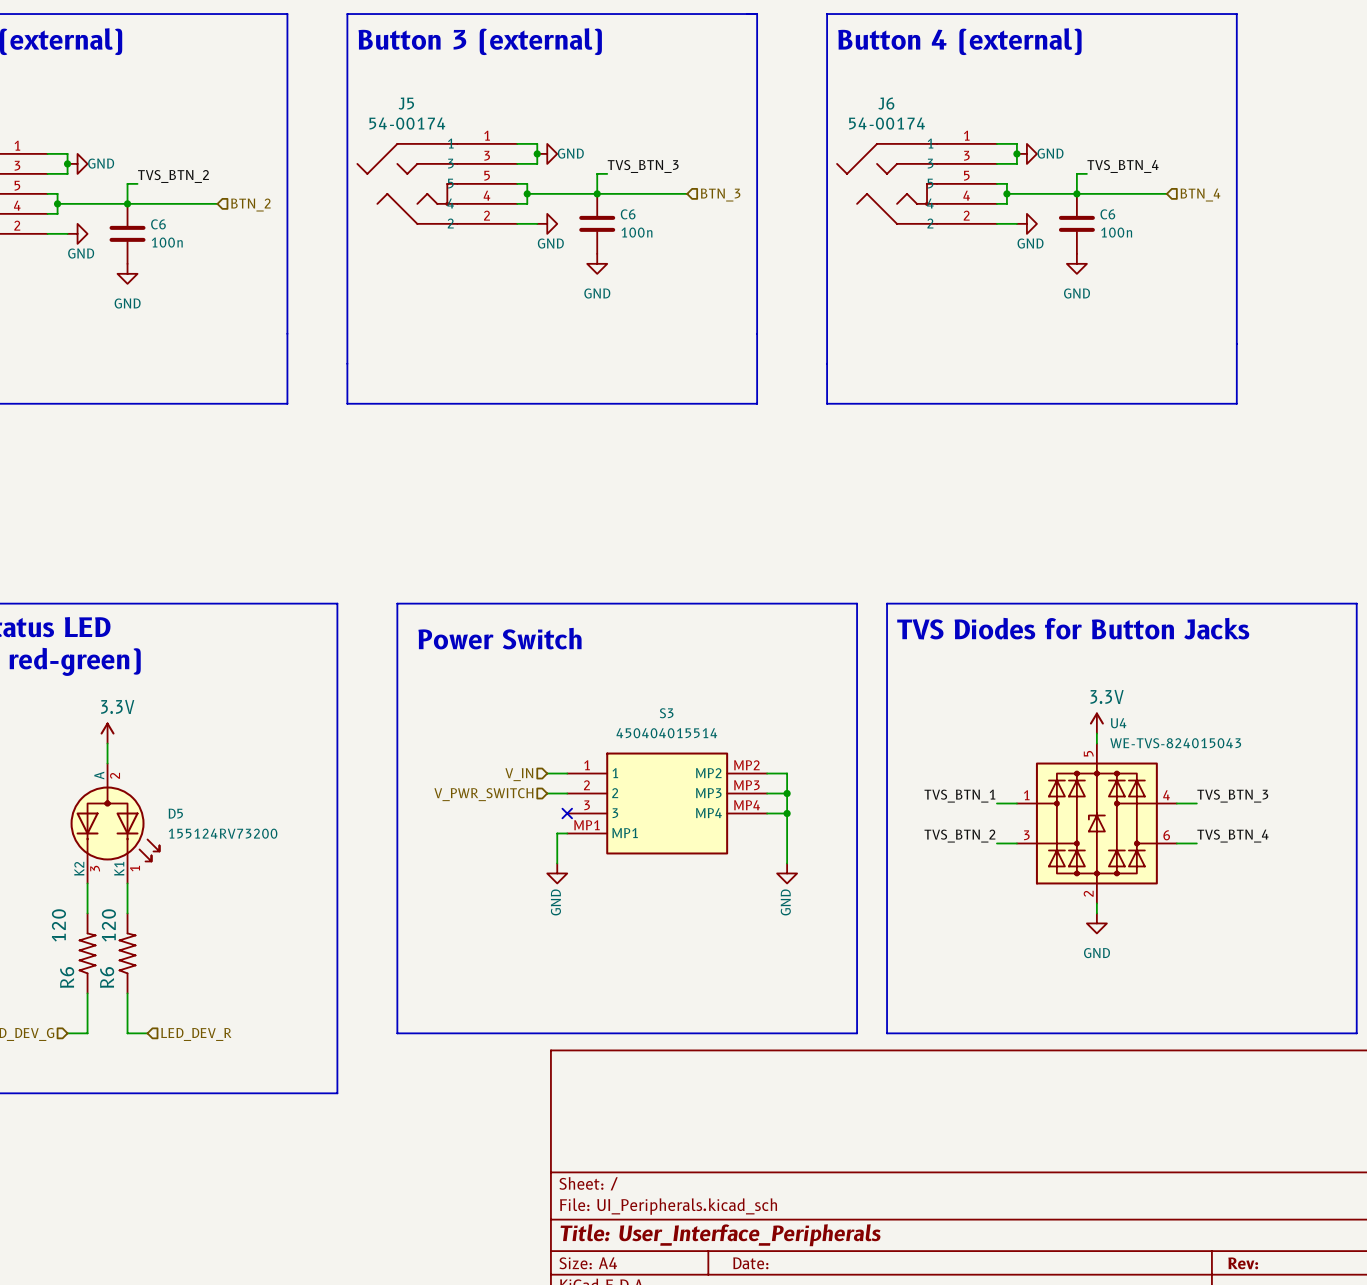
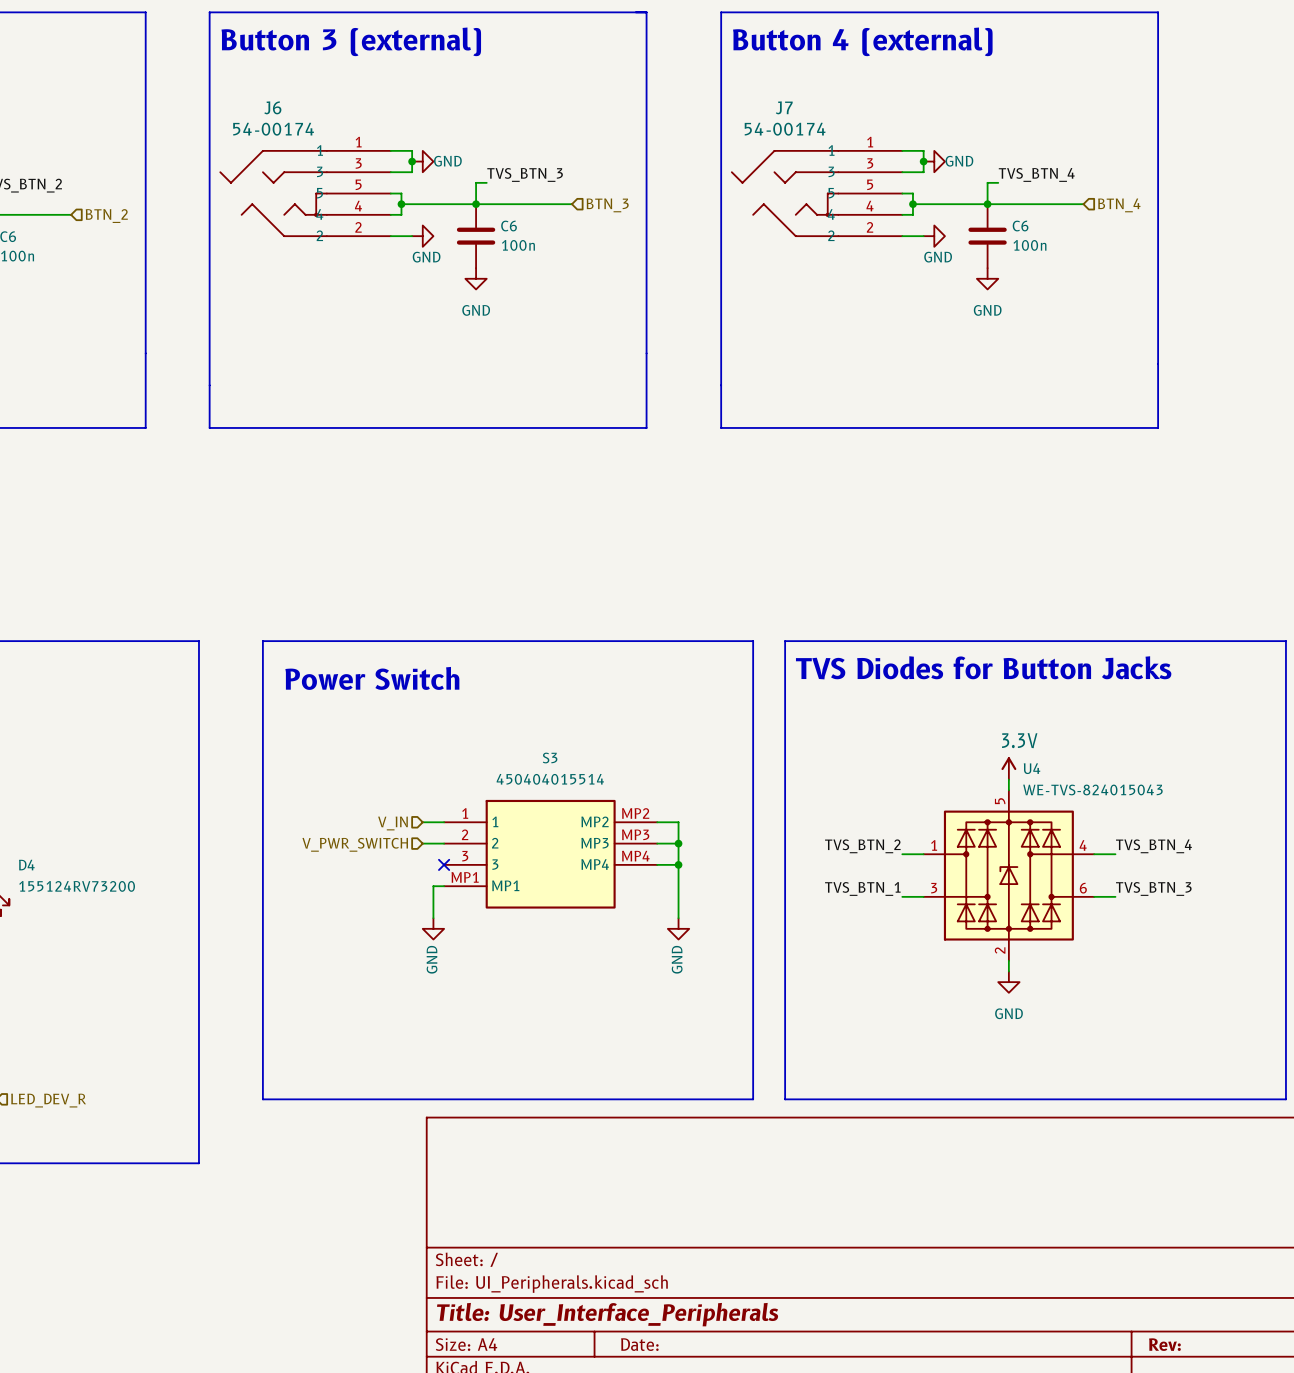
J5 name: J5 (406, 103) -> J6 (272, 107)
J6 name: J6 (886, 103) -> J7 (784, 107)
label: TVS_BTN_1 (959, 796) -> TVS_BTN_2 (862, 846)
label: TVS_BTN_3 (1232, 796) -> TVS_BTN_4 (1153, 846)
D5 name: D5 (175, 813) -> D4 (26, 865)
label: TVS_BTN_2 (959, 836) -> TVS_BTN_1 (862, 888)
label: TVS_BTN_4 (1232, 836) -> TVS_BTN_3 (1153, 888)

